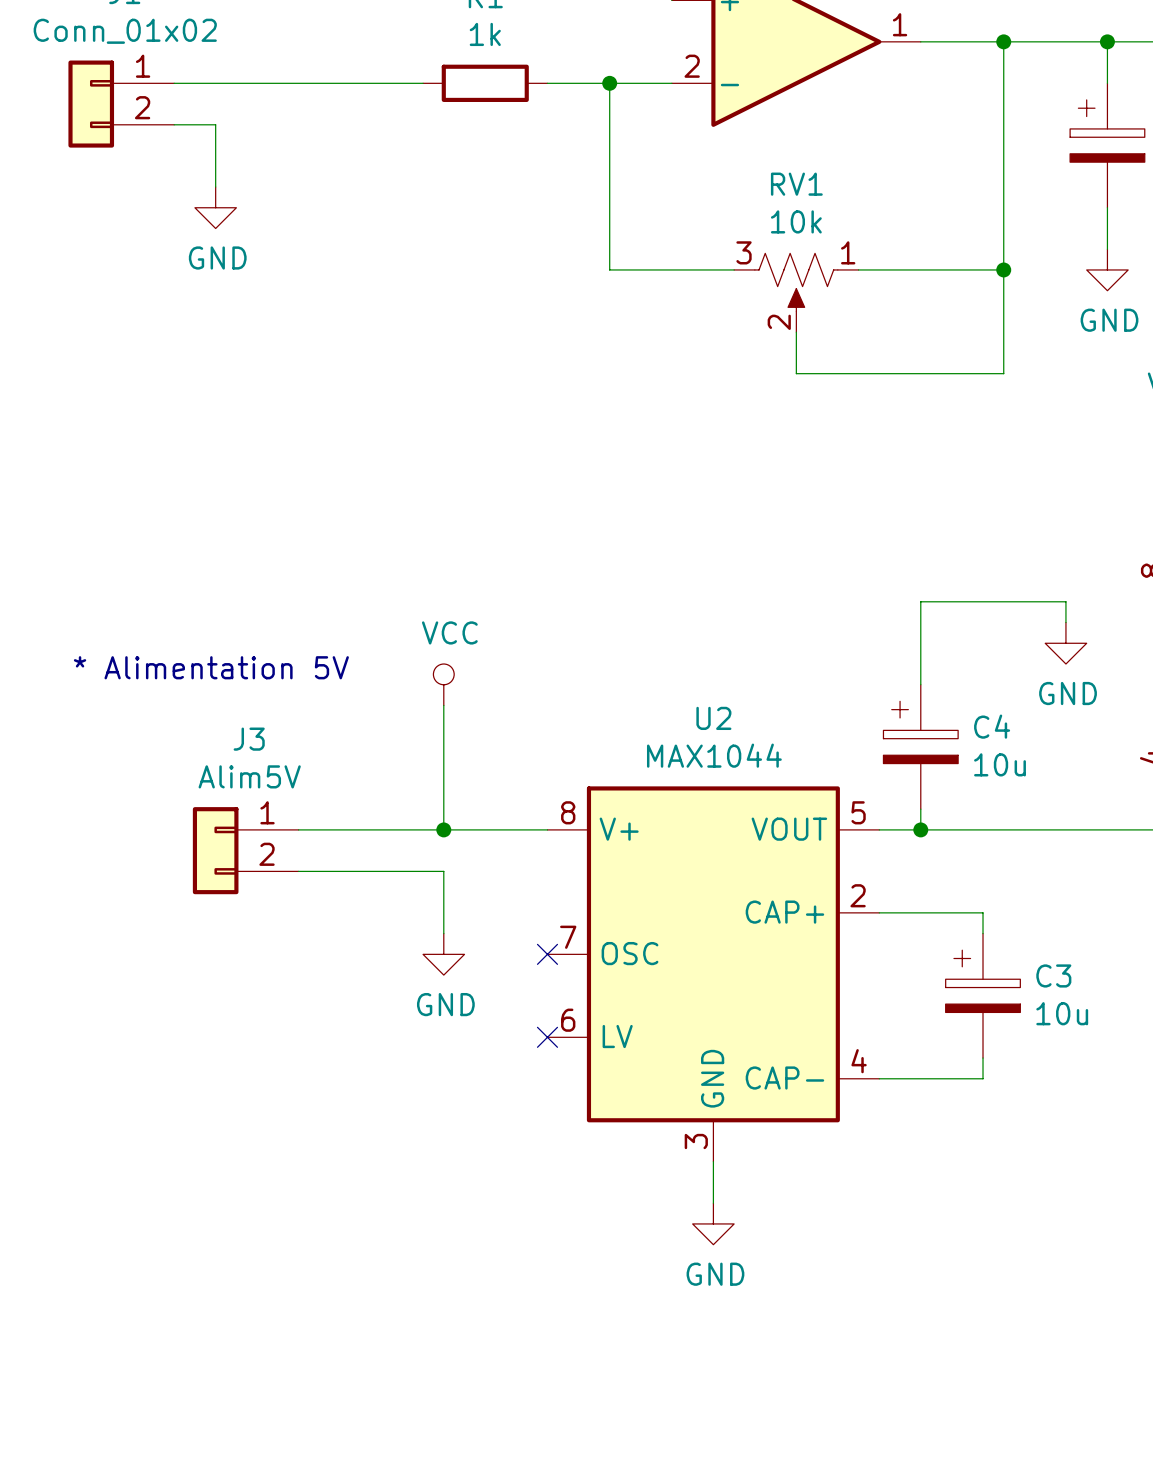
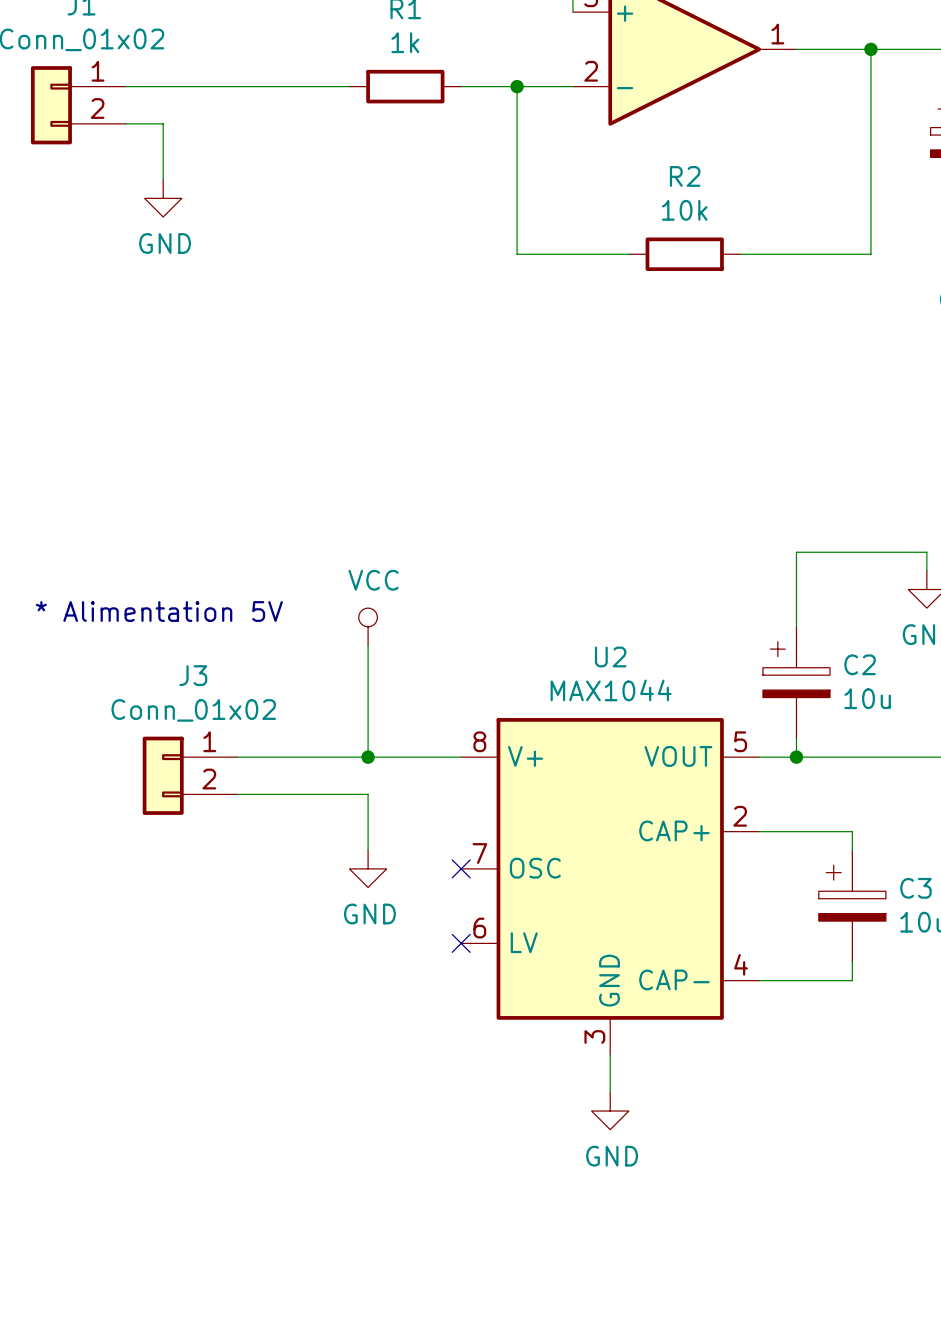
R2: none -> 10k (684, 254)
wire: (1003, 269) (1003, 373) (796, 373) (796, 332) -> none
junction: (1003, 269) -> none
RV1: 10k (796, 292) -> none
C4 name: C4 (992, 726) -> C2 (860, 664)
J3 value: Alim5V (249, 776) -> Conn_01x02 (193, 710)

